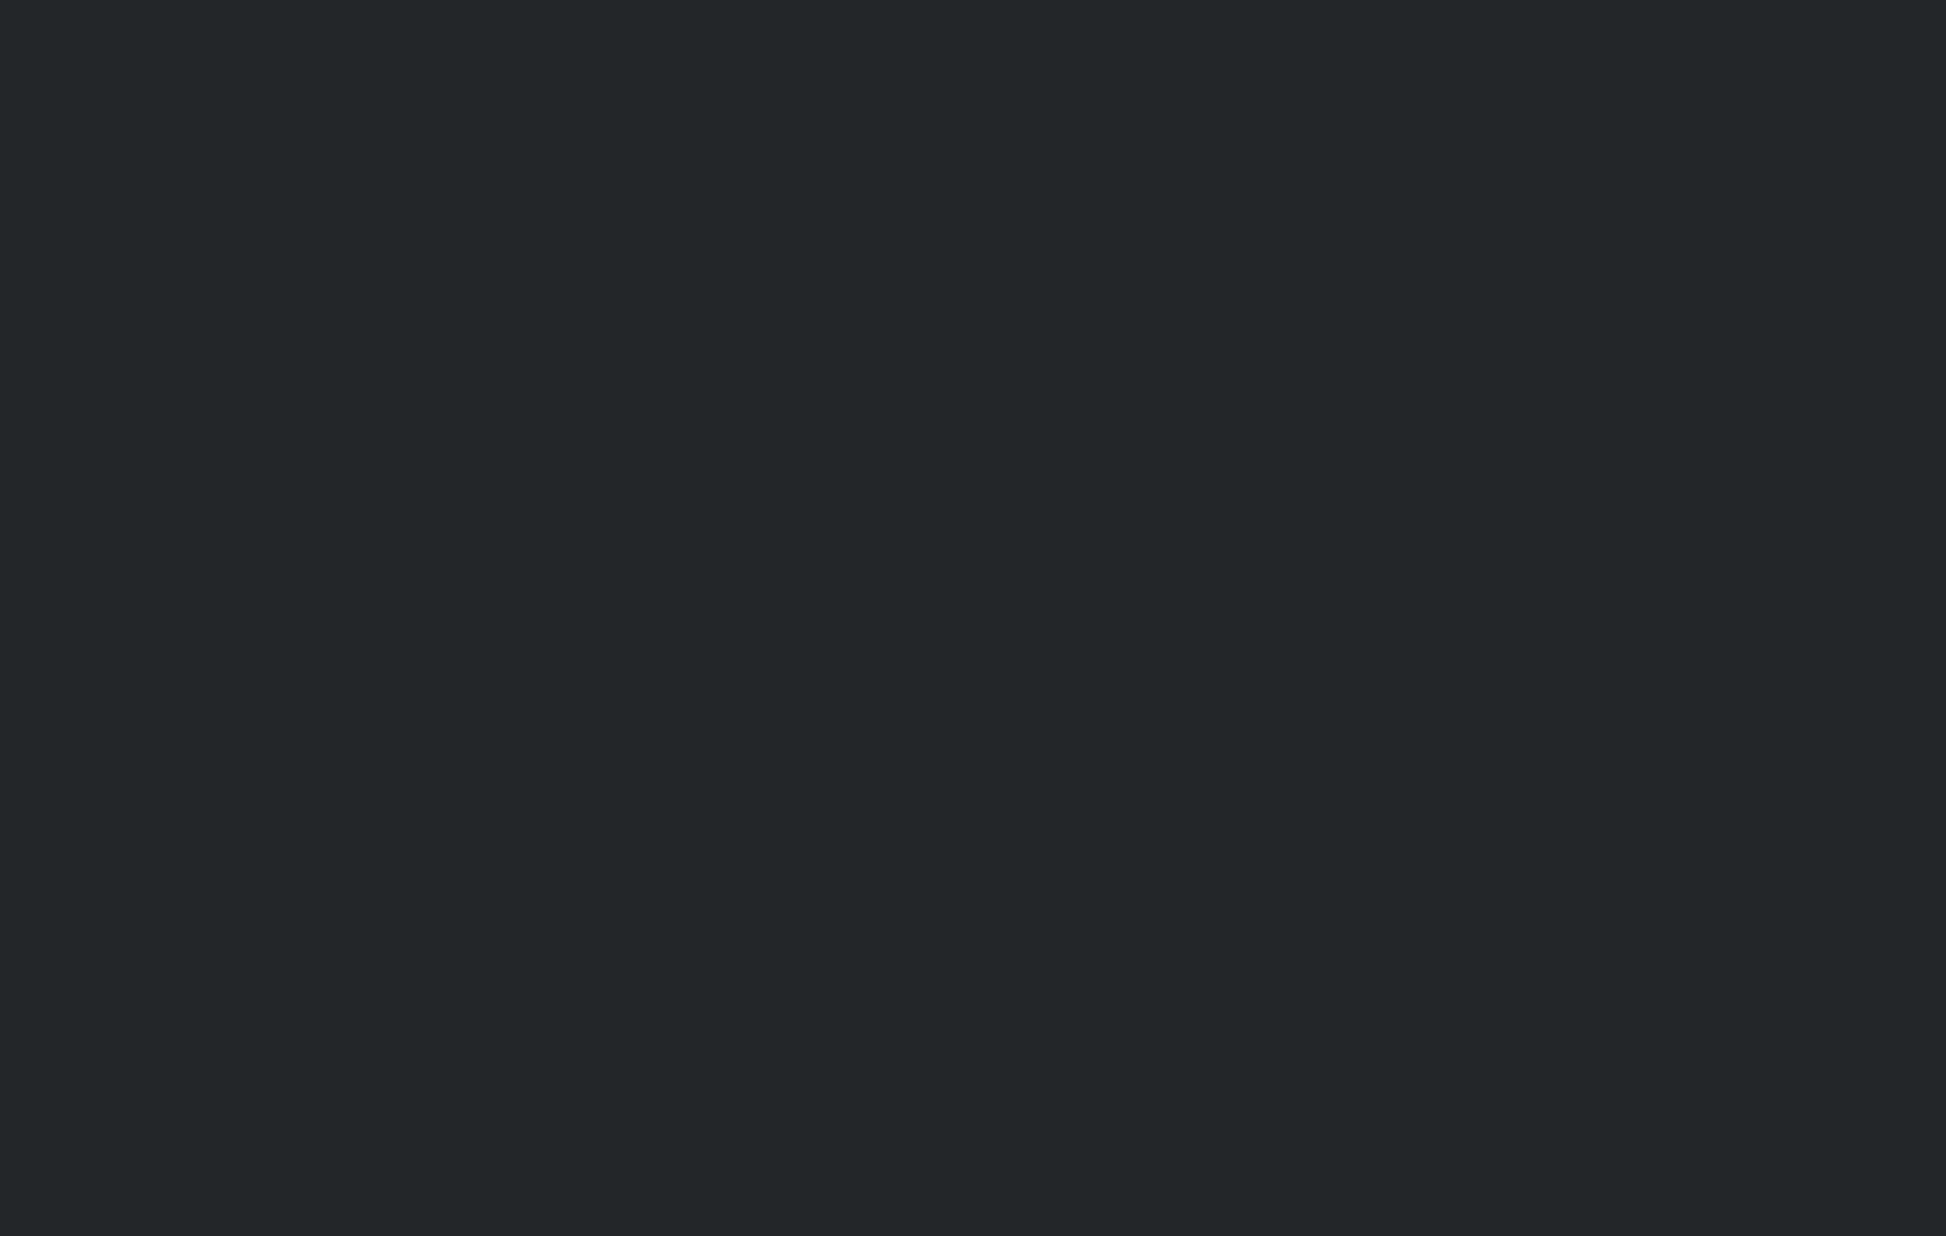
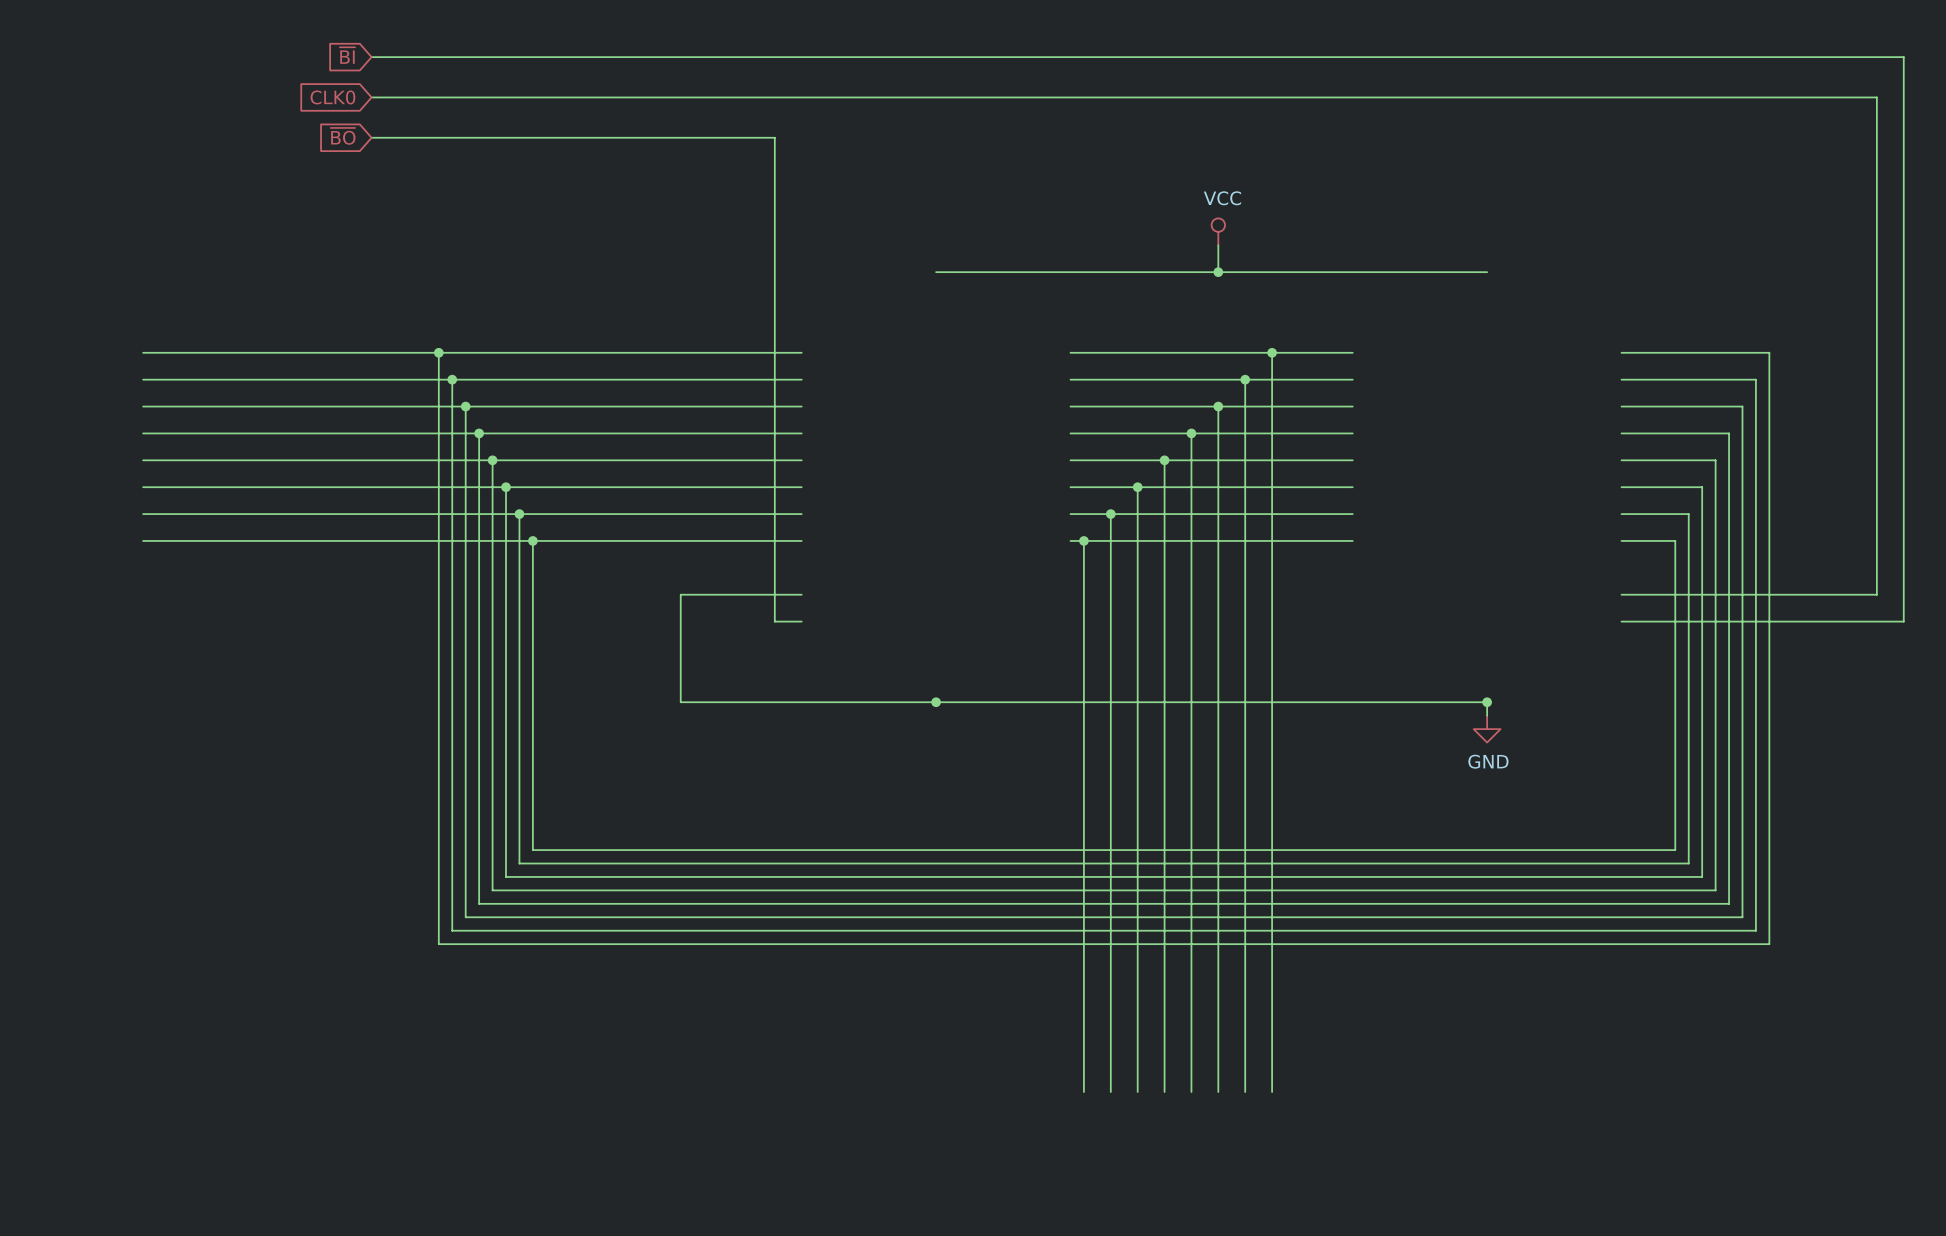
global label: none -> ~{BI} (347, 55)
wire: none -> (371, 57) (1903, 57) (1903, 621) (1621, 621)
global label: none -> CLK0 (332, 97)
wire: none -> (371, 97) (1876, 97) (1876, 594) (1621, 594)
global label: none -> ~{BO} (343, 136)
wire: none -> (371, 137) (774, 137) (774, 621) (801, 621)
power symbol: none -> VCC (1218, 231)
wire: none -> (1218, 245) (1218, 272)
wire: none -> (936, 272) (1487, 272)
junction: none -> (1218, 272)
wire: none -> (143, 352) (801, 352)
wire: none -> (438, 352) (438, 944) (1769, 944) (1769, 352) (1621, 352)
junction: none -> (438, 352)
wire: none -> (1070, 352) (1352, 352)
wire: none -> (1272, 352) (1272, 1091)
junction: none -> (1272, 352)
wire: none -> (143, 379) (801, 379)
wire: none -> (452, 379) (452, 930) (1755, 930) (1755, 379) (1621, 379)
junction: none -> (452, 379)
wire: none -> (1070, 379) (1352, 379)
wire: none -> (1245, 379) (1245, 1091)
junction: none -> (1245, 379)
wire: none -> (143, 406) (801, 406)
wire: none -> (465, 406) (465, 917) (1742, 917) (1742, 406) (1621, 406)
junction: none -> (465, 406)
wire: none -> (1070, 406) (1352, 406)
wire: none -> (1218, 406) (1218, 1091)
junction: none -> (1218, 406)
wire: none -> (143, 433) (801, 433)
wire: none -> (479, 433) (479, 903) (1729, 903) (1729, 433) (1621, 433)
junction: none -> (479, 433)
wire: none -> (1070, 433) (1352, 433)
wire: none -> (1191, 433) (1191, 1091)
junction: none -> (1191, 433)
wire: none -> (143, 460) (801, 460)
wire: none -> (492, 460) (492, 890) (1715, 890) (1715, 460) (1621, 460)
junction: none -> (492, 460)
wire: none -> (1070, 460) (1352, 460)
wire: none -> (1164, 460) (1164, 1091)
junction: none -> (1164, 460)
wire: none -> (143, 487) (801, 487)
wire: none -> (506, 487) (506, 876) (1702, 876) (1702, 487) (1621, 487)
junction: none -> (506, 487)
wire: none -> (1070, 487) (1352, 487)
wire: none -> (1137, 487) (1137, 1091)
junction: none -> (1137, 487)
wire: none -> (143, 514) (801, 514)
wire: none -> (519, 514) (519, 863) (1688, 863) (1688, 514) (1621, 514)
junction: none -> (519, 514)
wire: none -> (1070, 514) (1352, 514)
wire: none -> (1110, 514) (1110, 1091)
junction: none -> (1110, 514)
wire: none -> (143, 540) (801, 540)
wire: none -> (532, 540) (532, 850) (1675, 850) (1675, 540) (1621, 540)
junction: none -> (532, 540)
wire: none -> (1070, 540) (1352, 540)
wire: none -> (1083, 540) (1083, 1091)
junction: none -> (1083, 540)
wire: none -> (801, 594) (680, 594) (680, 702) (1487, 702) (1487, 715)
junction: none -> (936, 702)
junction: none -> (1487, 702)
power symbol: none -> GND (1487, 729)

